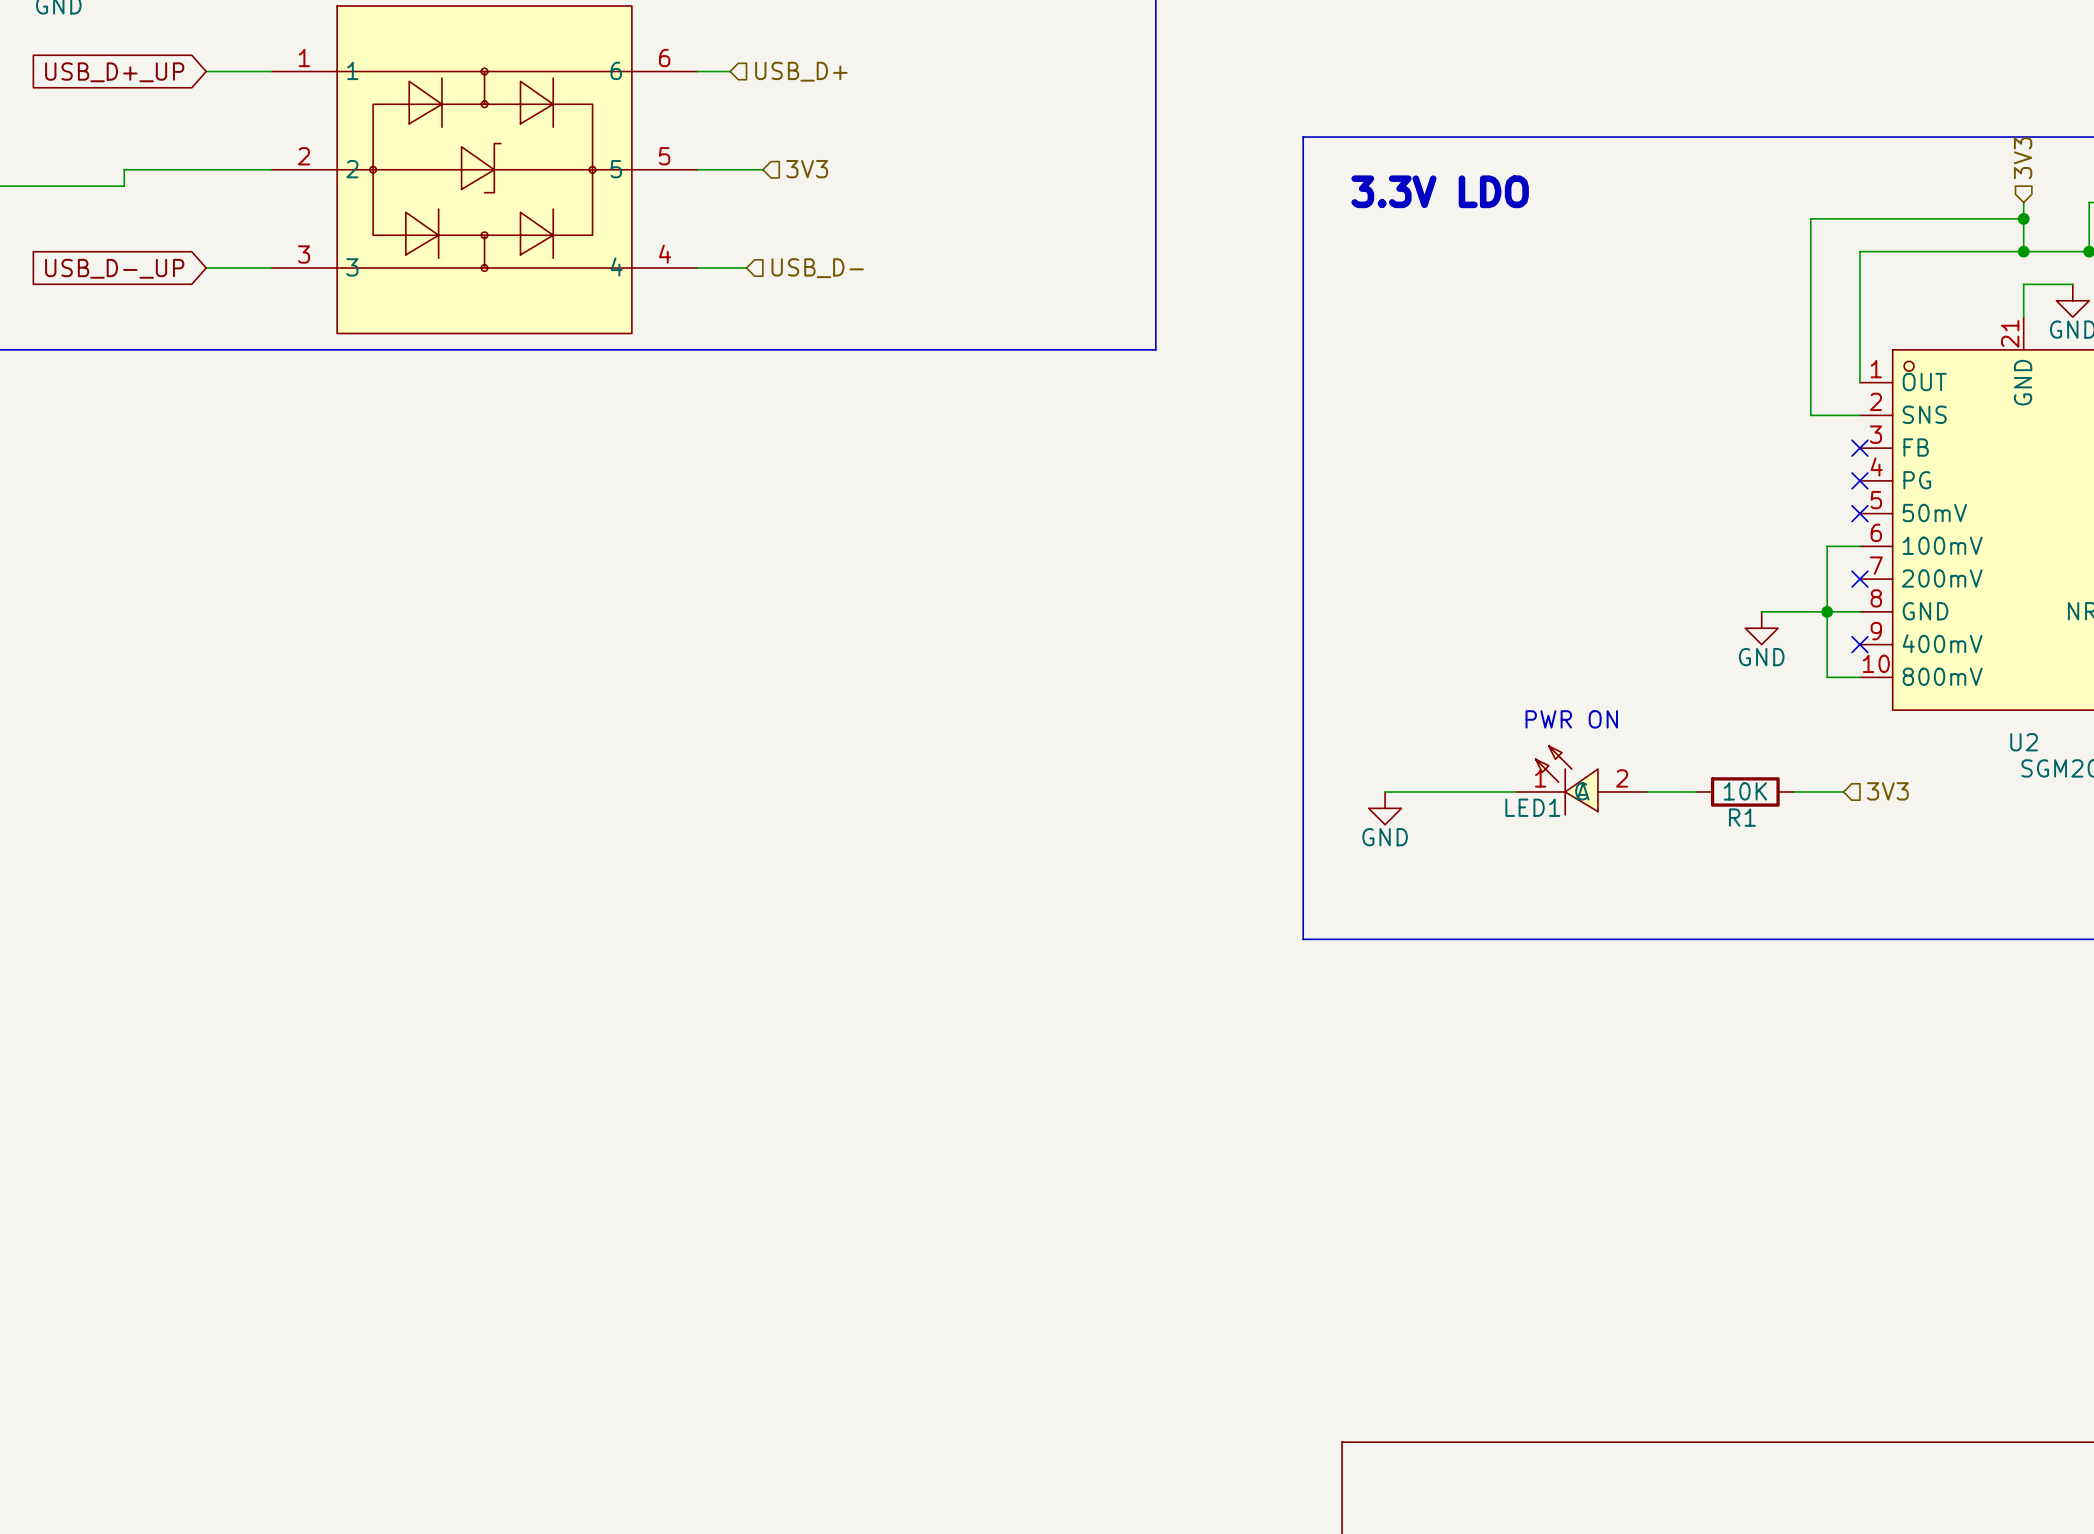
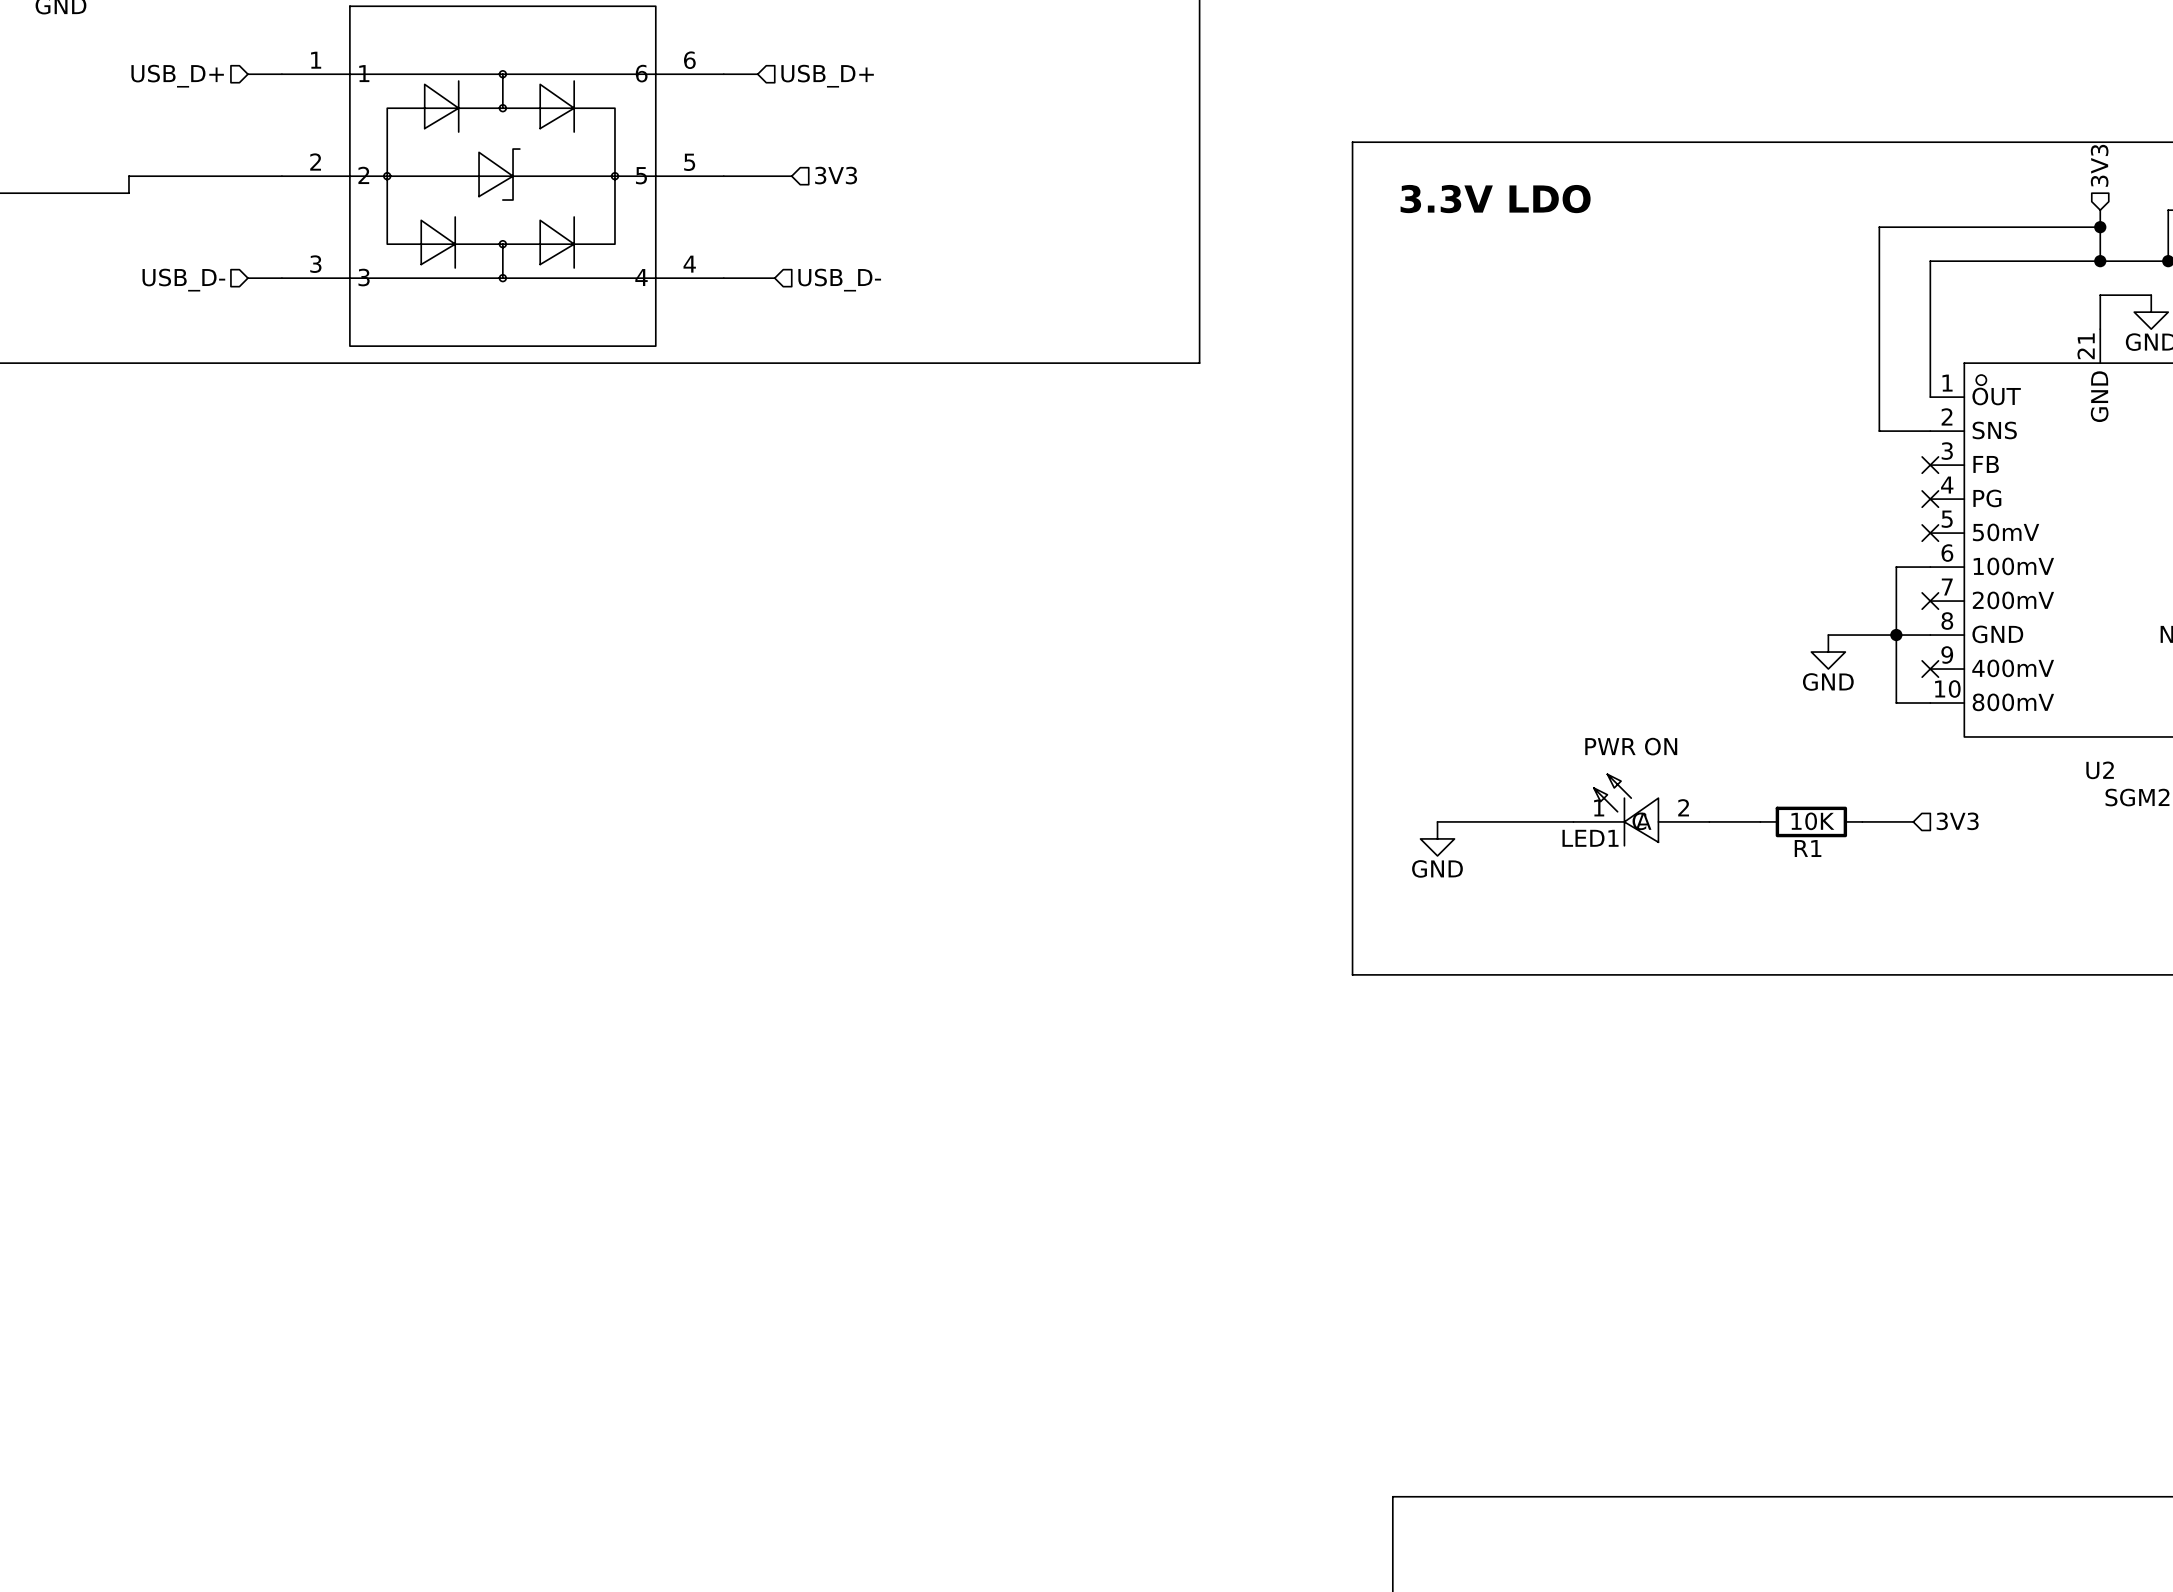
hierarchical label: none -> USB_D+ (177, 76)
wire: (206, 71) (238, 71) -> none
global label: USB_D+_UP (114, 72) -> none
global label: USB_D-_UP (114, 268) -> none
hierarchical label: none -> USB_D- (183, 280)
wire: (206, 268) (238, 268) -> none

